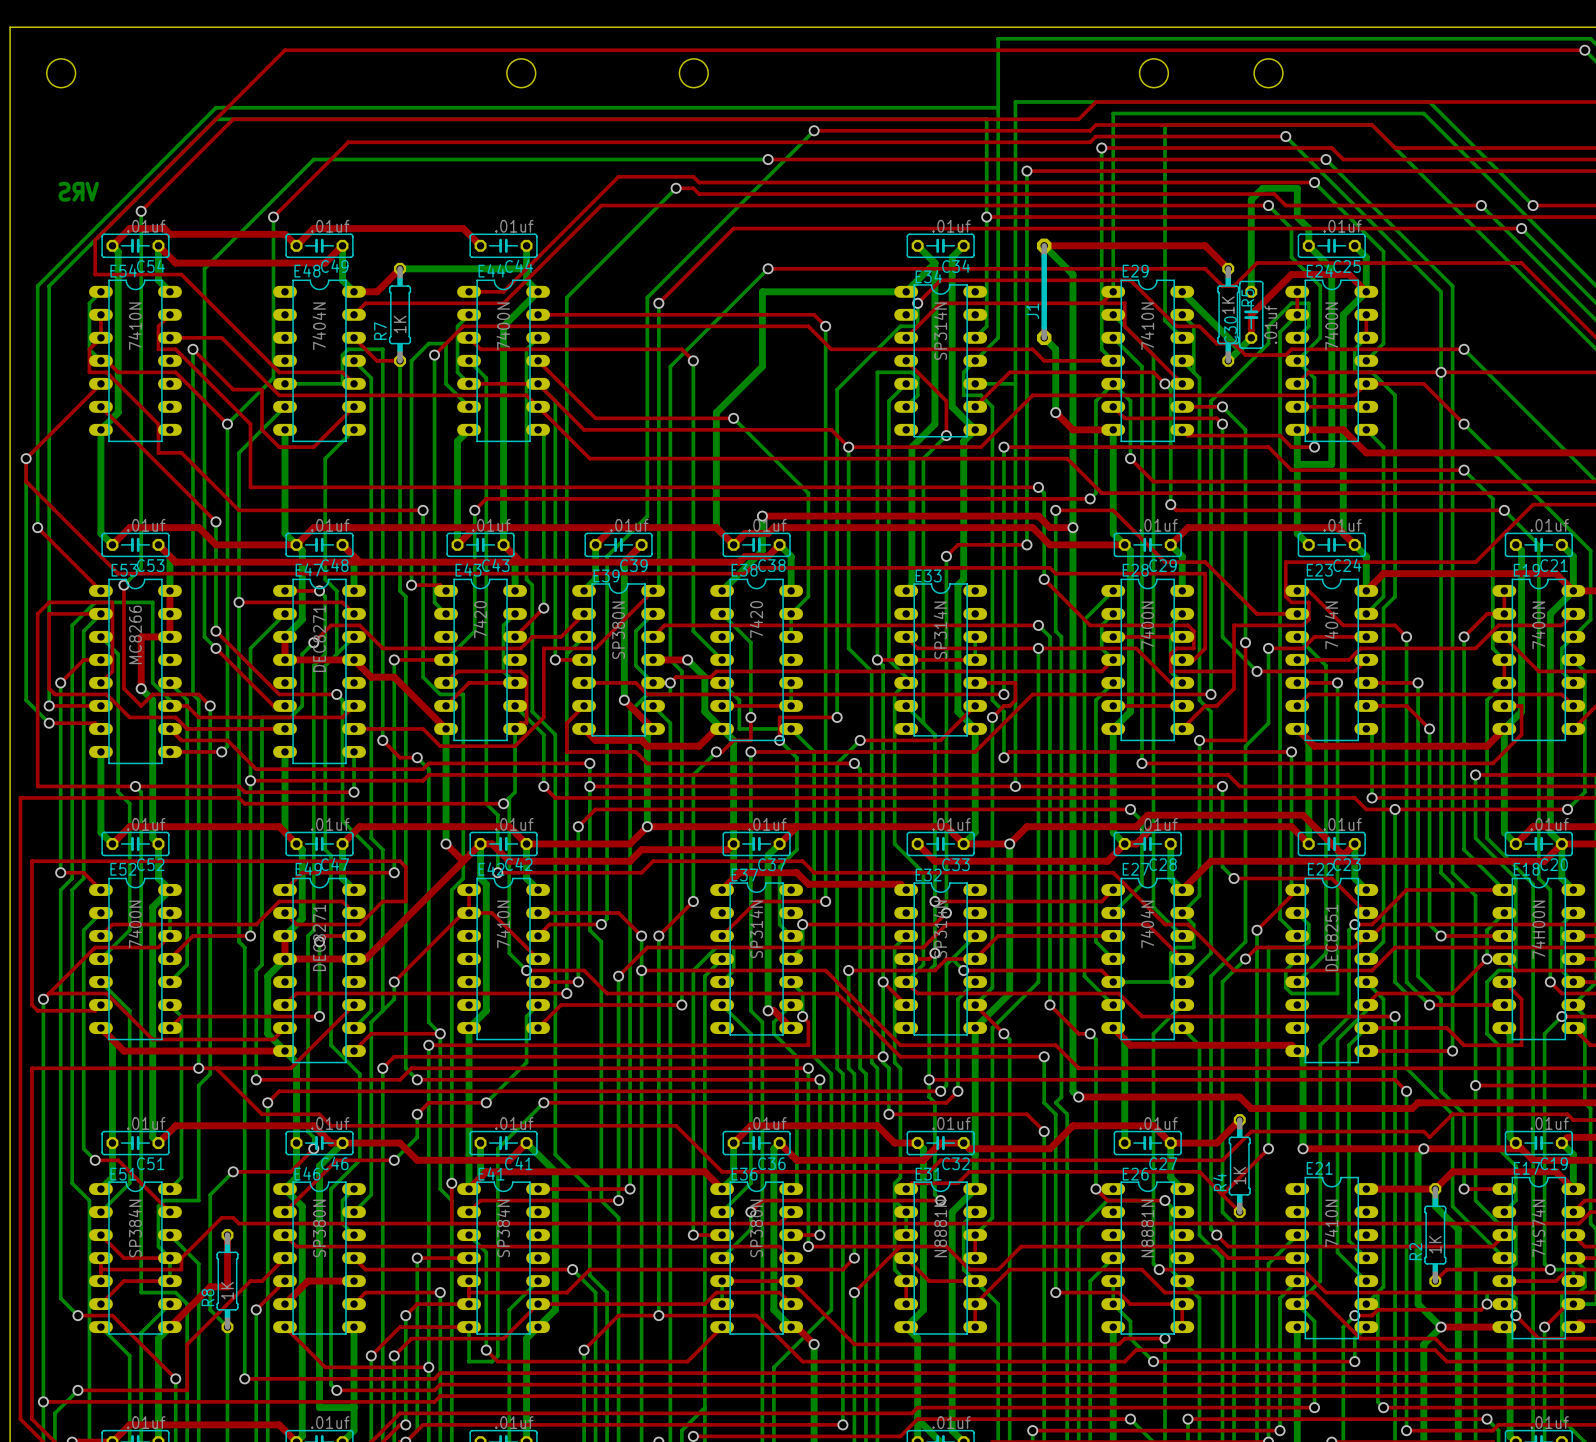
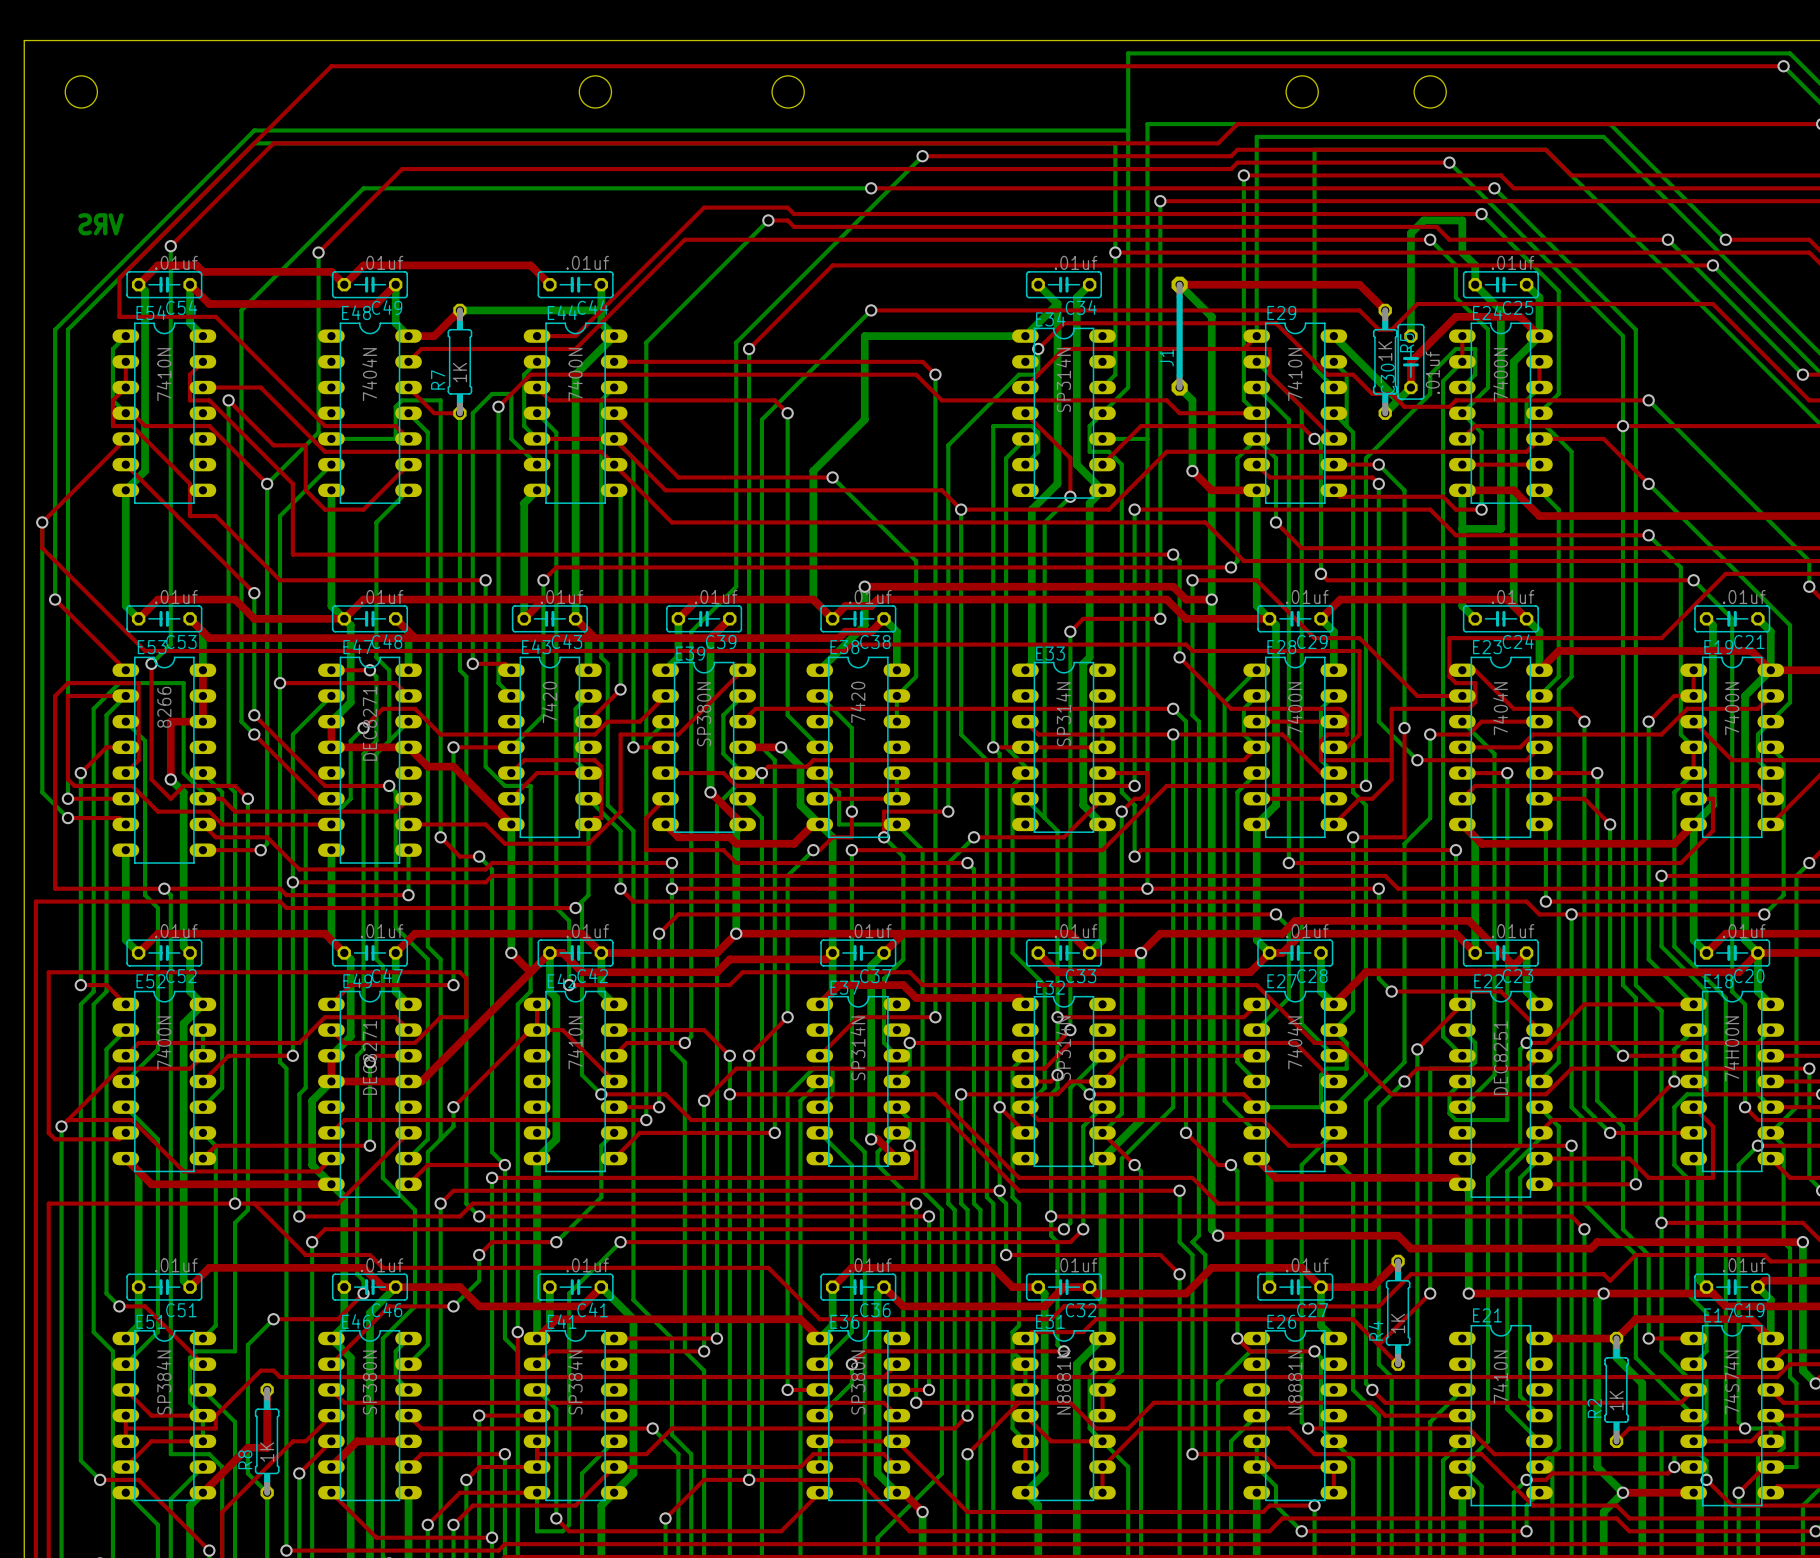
E53 value: MC8266 (135, 634) -> 8266 (164, 707)

